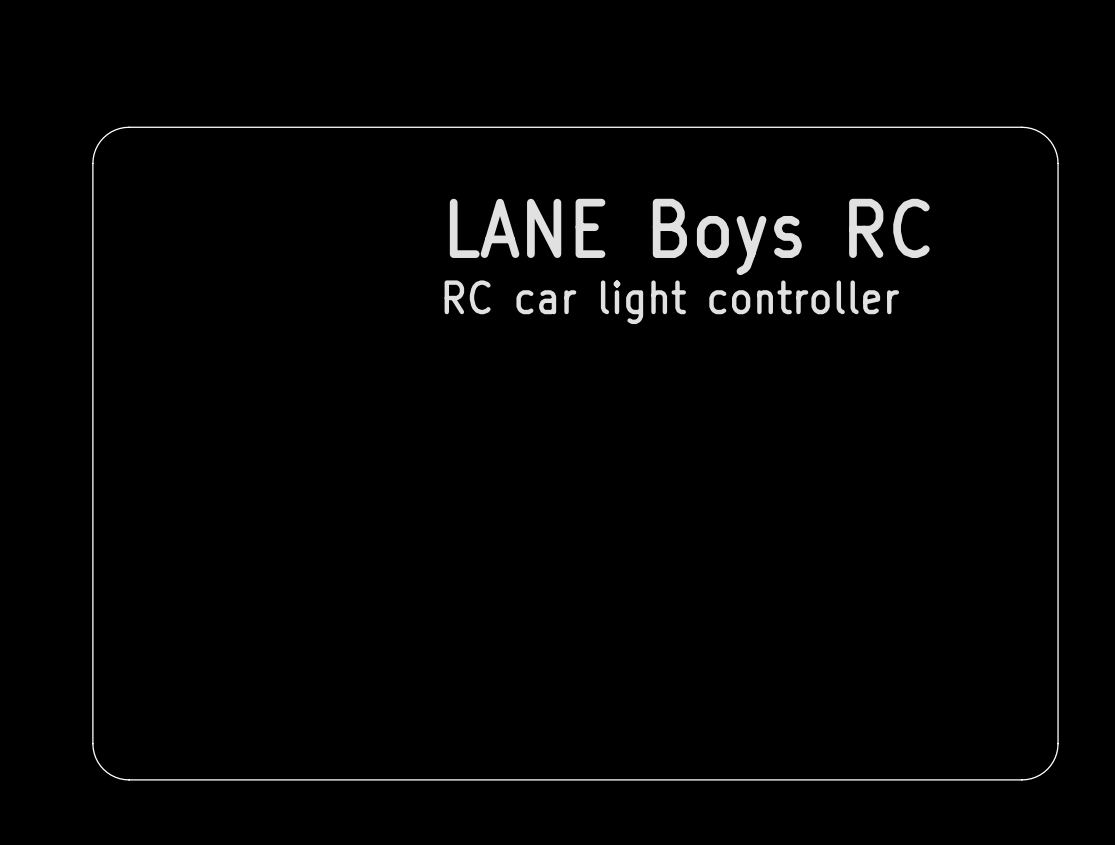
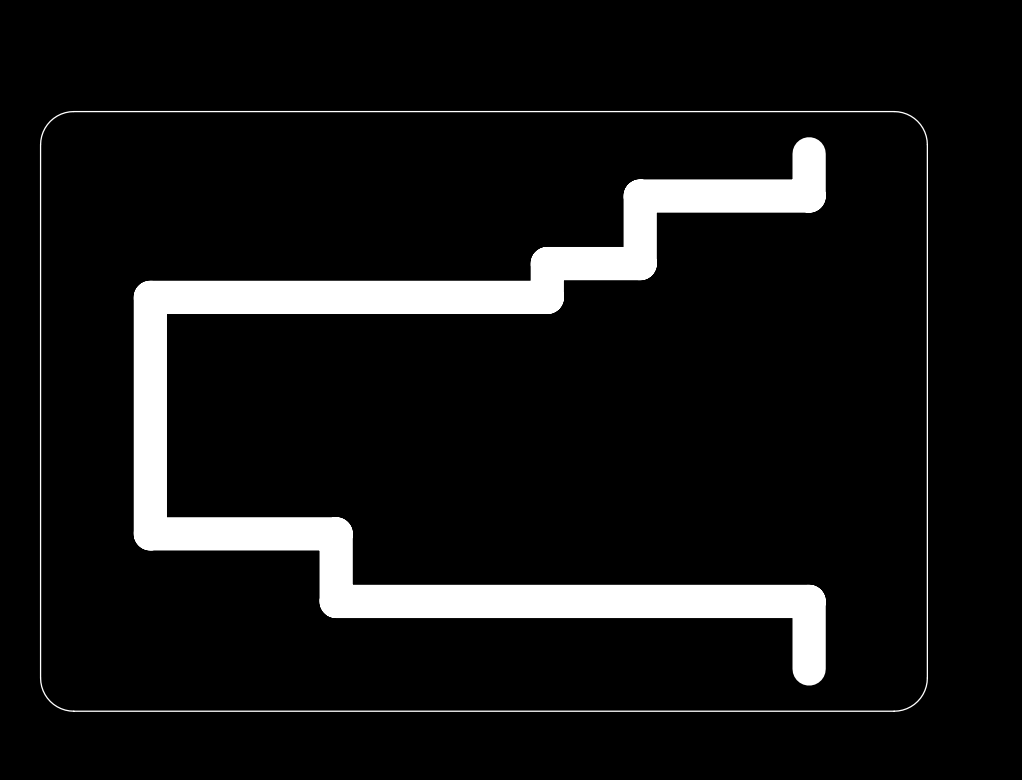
board edge: none -> (809, 153) (809, 196) (640, 196) (640, 263) (547, 263) (547, 297) (150, 297) (150, 533) (336, 533) (336, 601) (809, 601) (809, 668)
text: LANE Boys RC (689, 236) -> none
text: RC car light controller (671, 302) -> none

